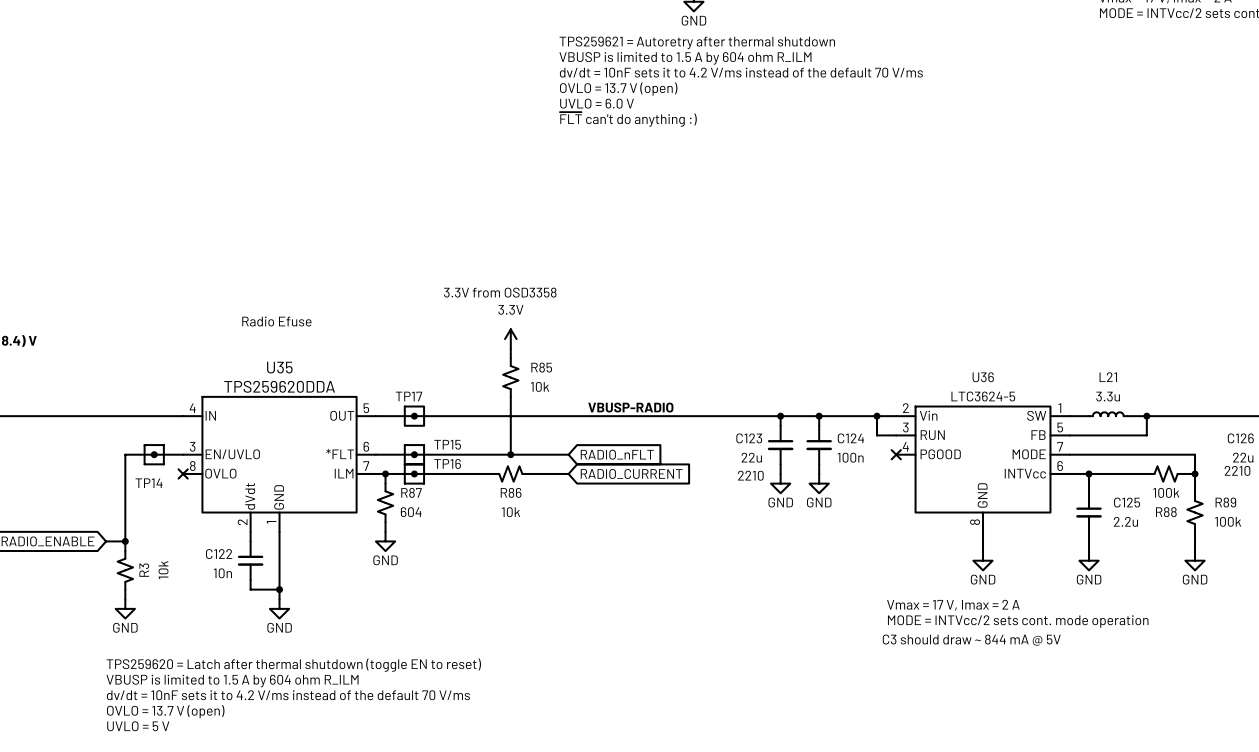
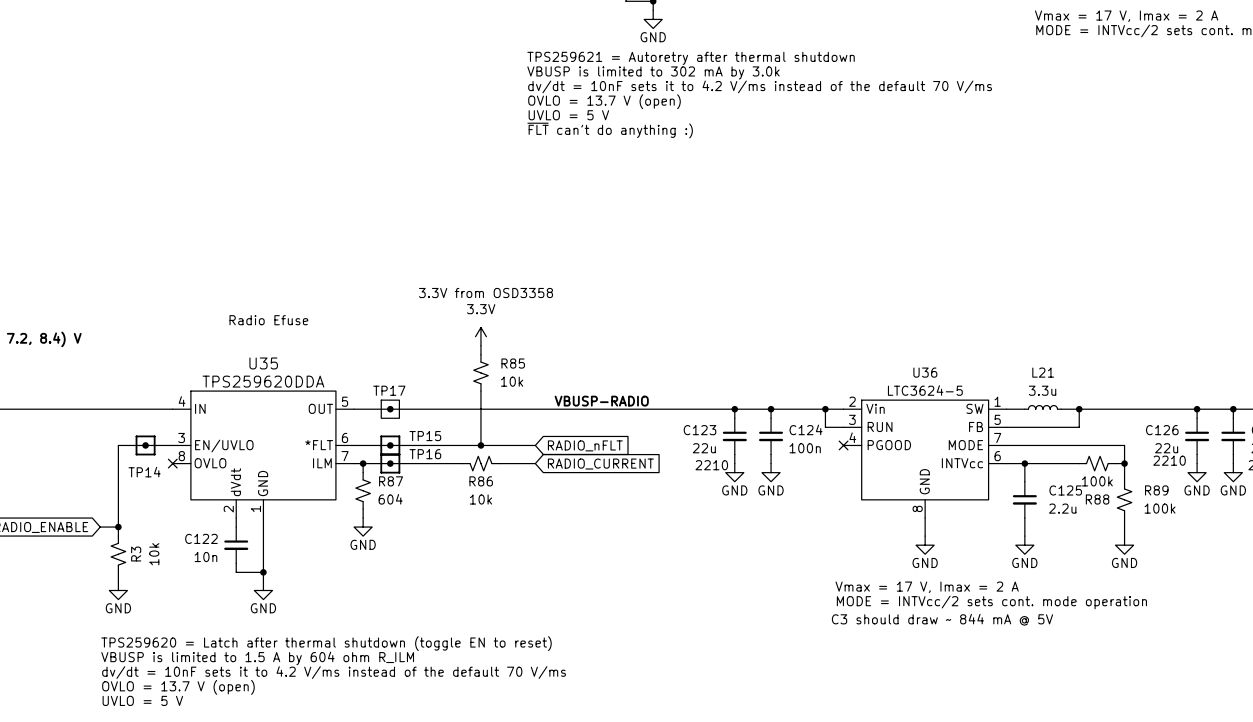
text: VBUSP is limited to 1.5 A by 604 ohm R_ILM (685, 58) -> VBUSP is limited to 302 mA by 3.0k (653, 72)
text: UVLO = 6.0 V (597, 103) -> UVLO = 5 V (568, 115)

